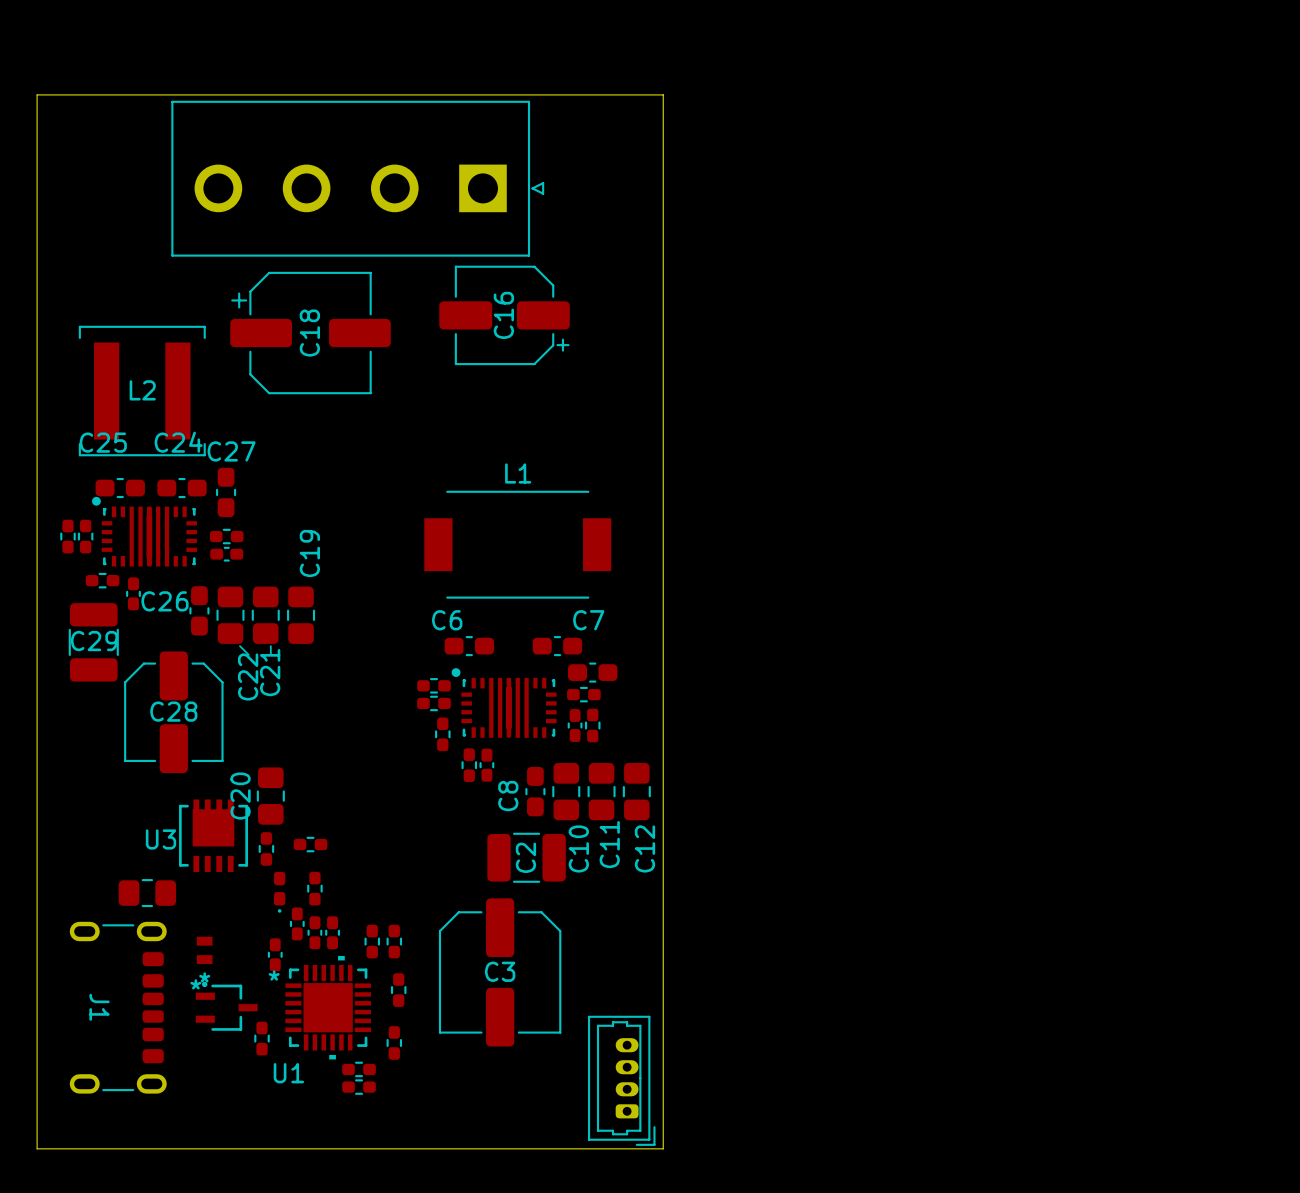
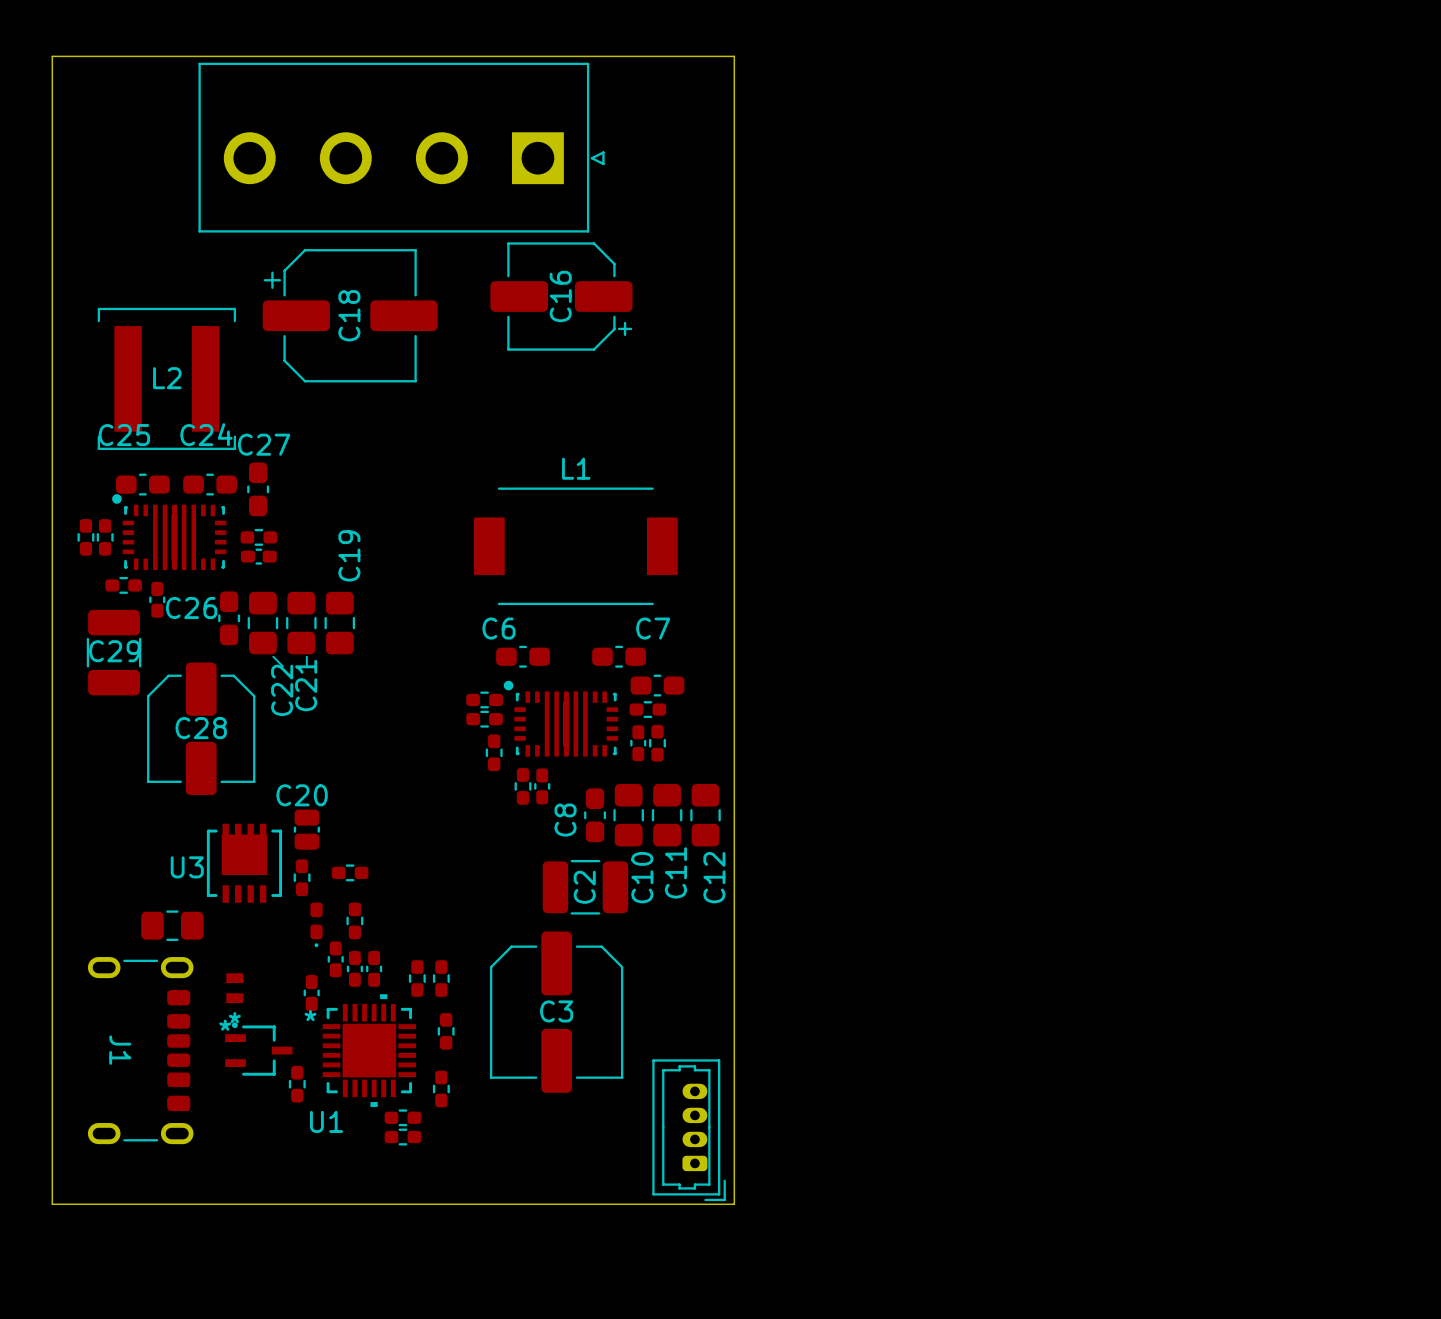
C20 footprint: [256, 767, 285, 825] -> [293, 809, 320, 850]
C20 name position: C20 (240, 796) -> C20 (302, 795)

